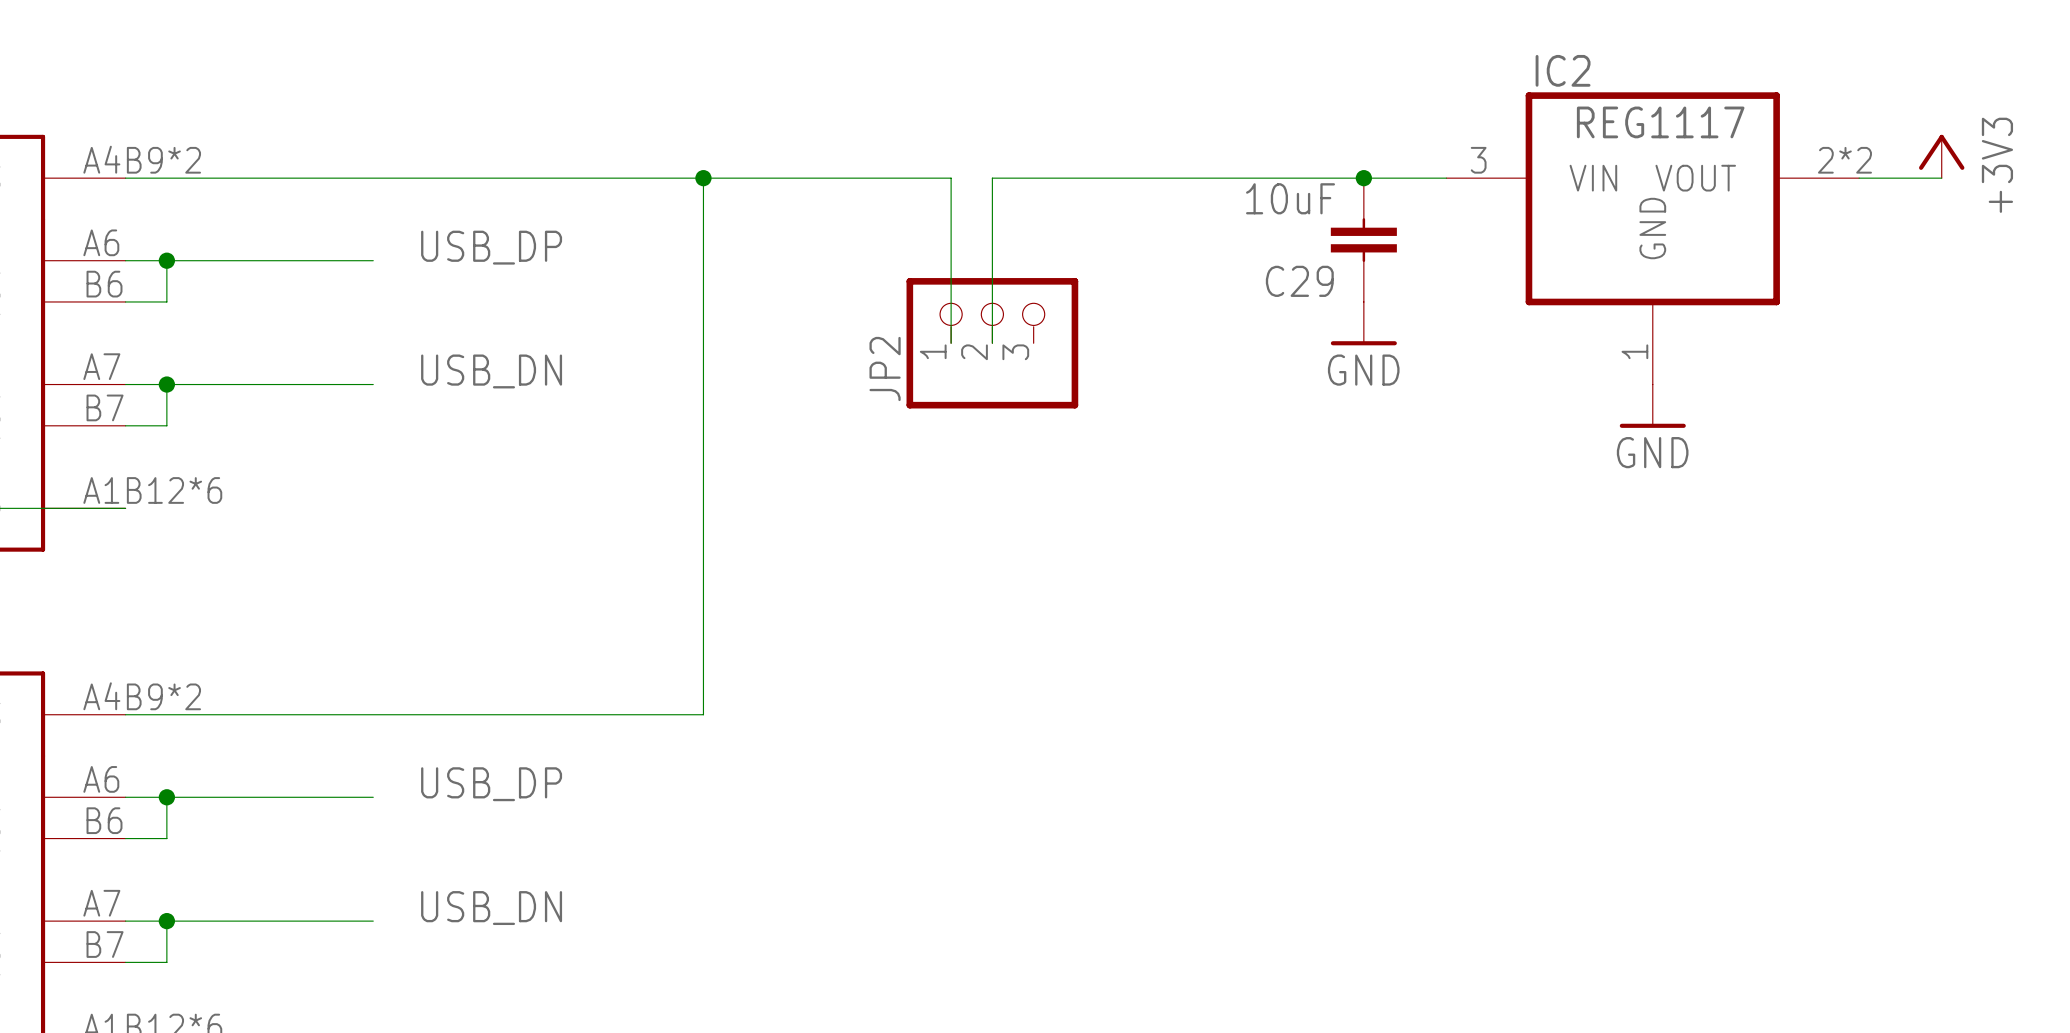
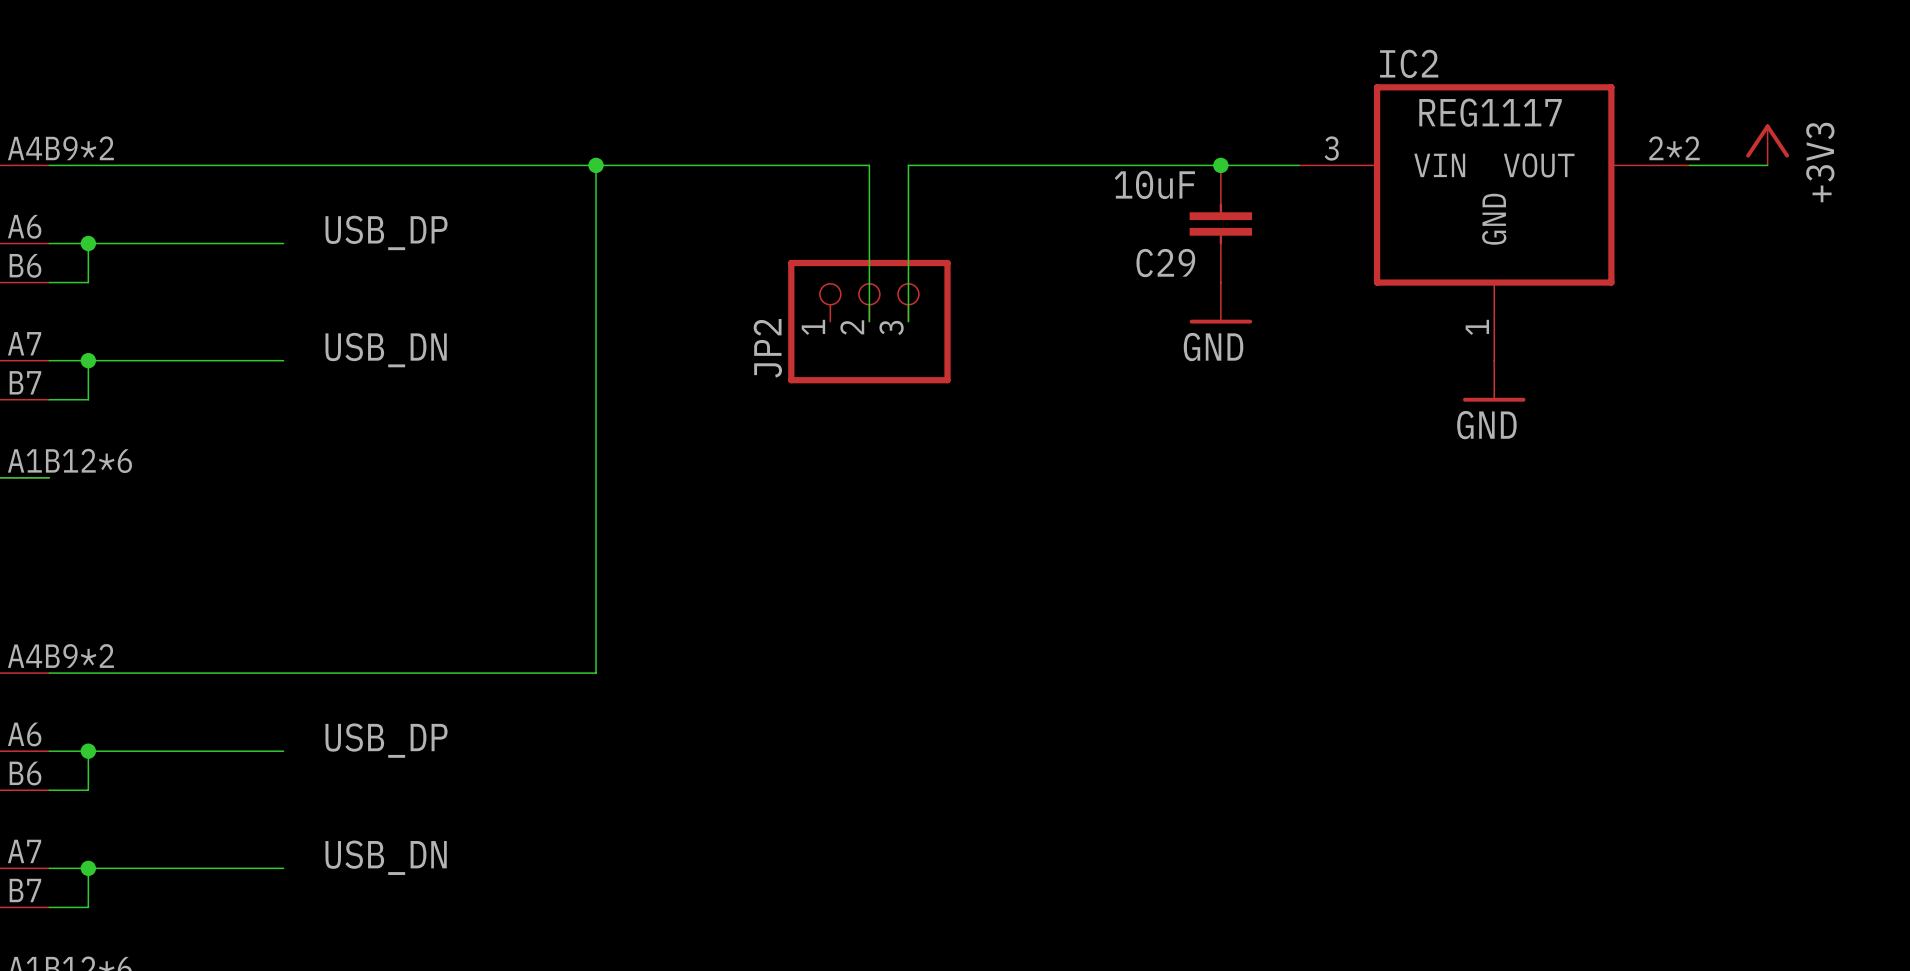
wire: (951, 178) (951, 343) -> (908, 165) (908, 321)
wire: (992, 178) (1033, 178) -> (869, 165) (830, 165)

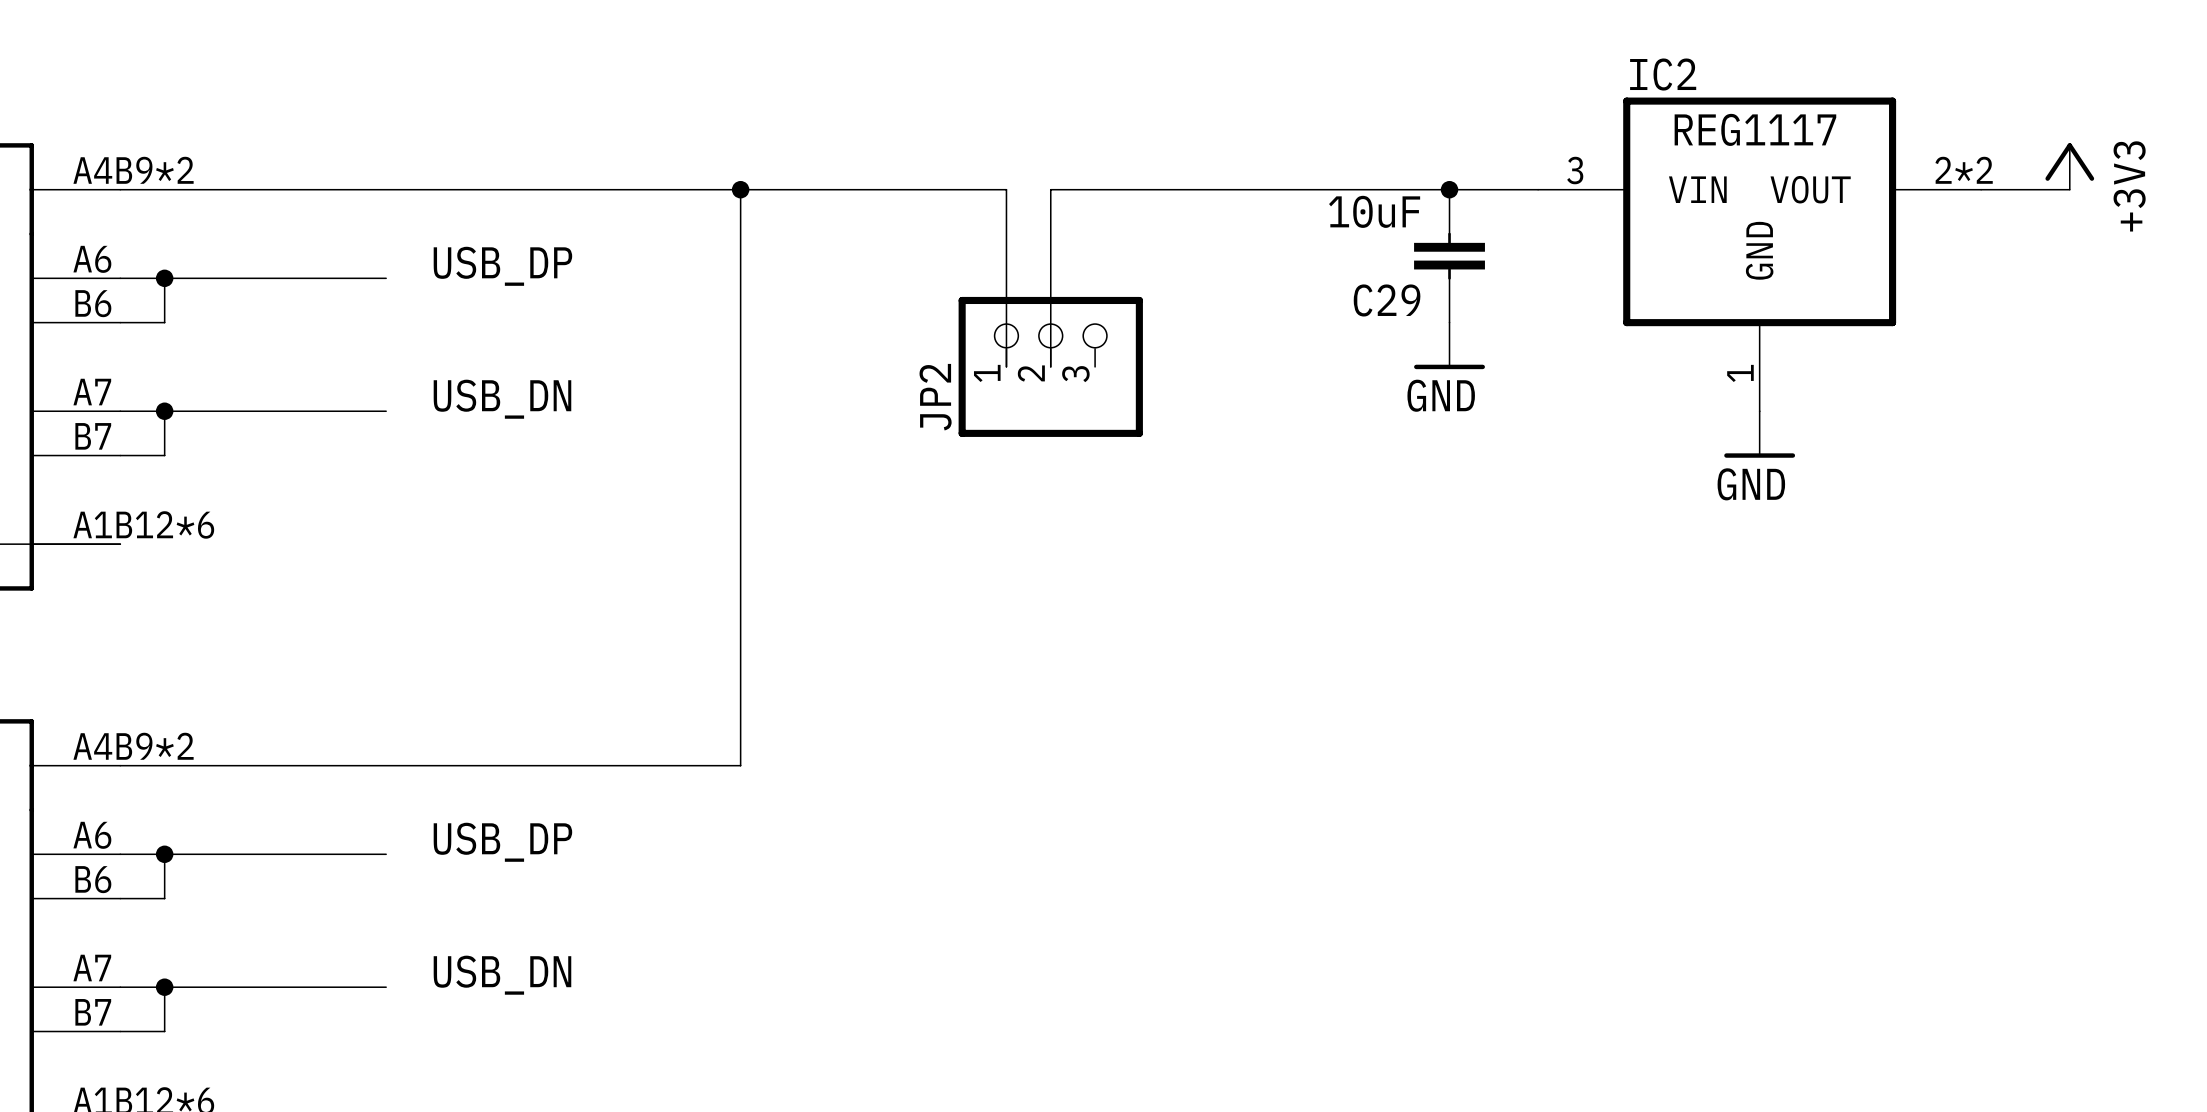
wire: (830, 165) (869, 165) -> (1095, 189) (1050, 189)
wire: (908, 165) (908, 321) -> (1006, 189) (1006, 366)

